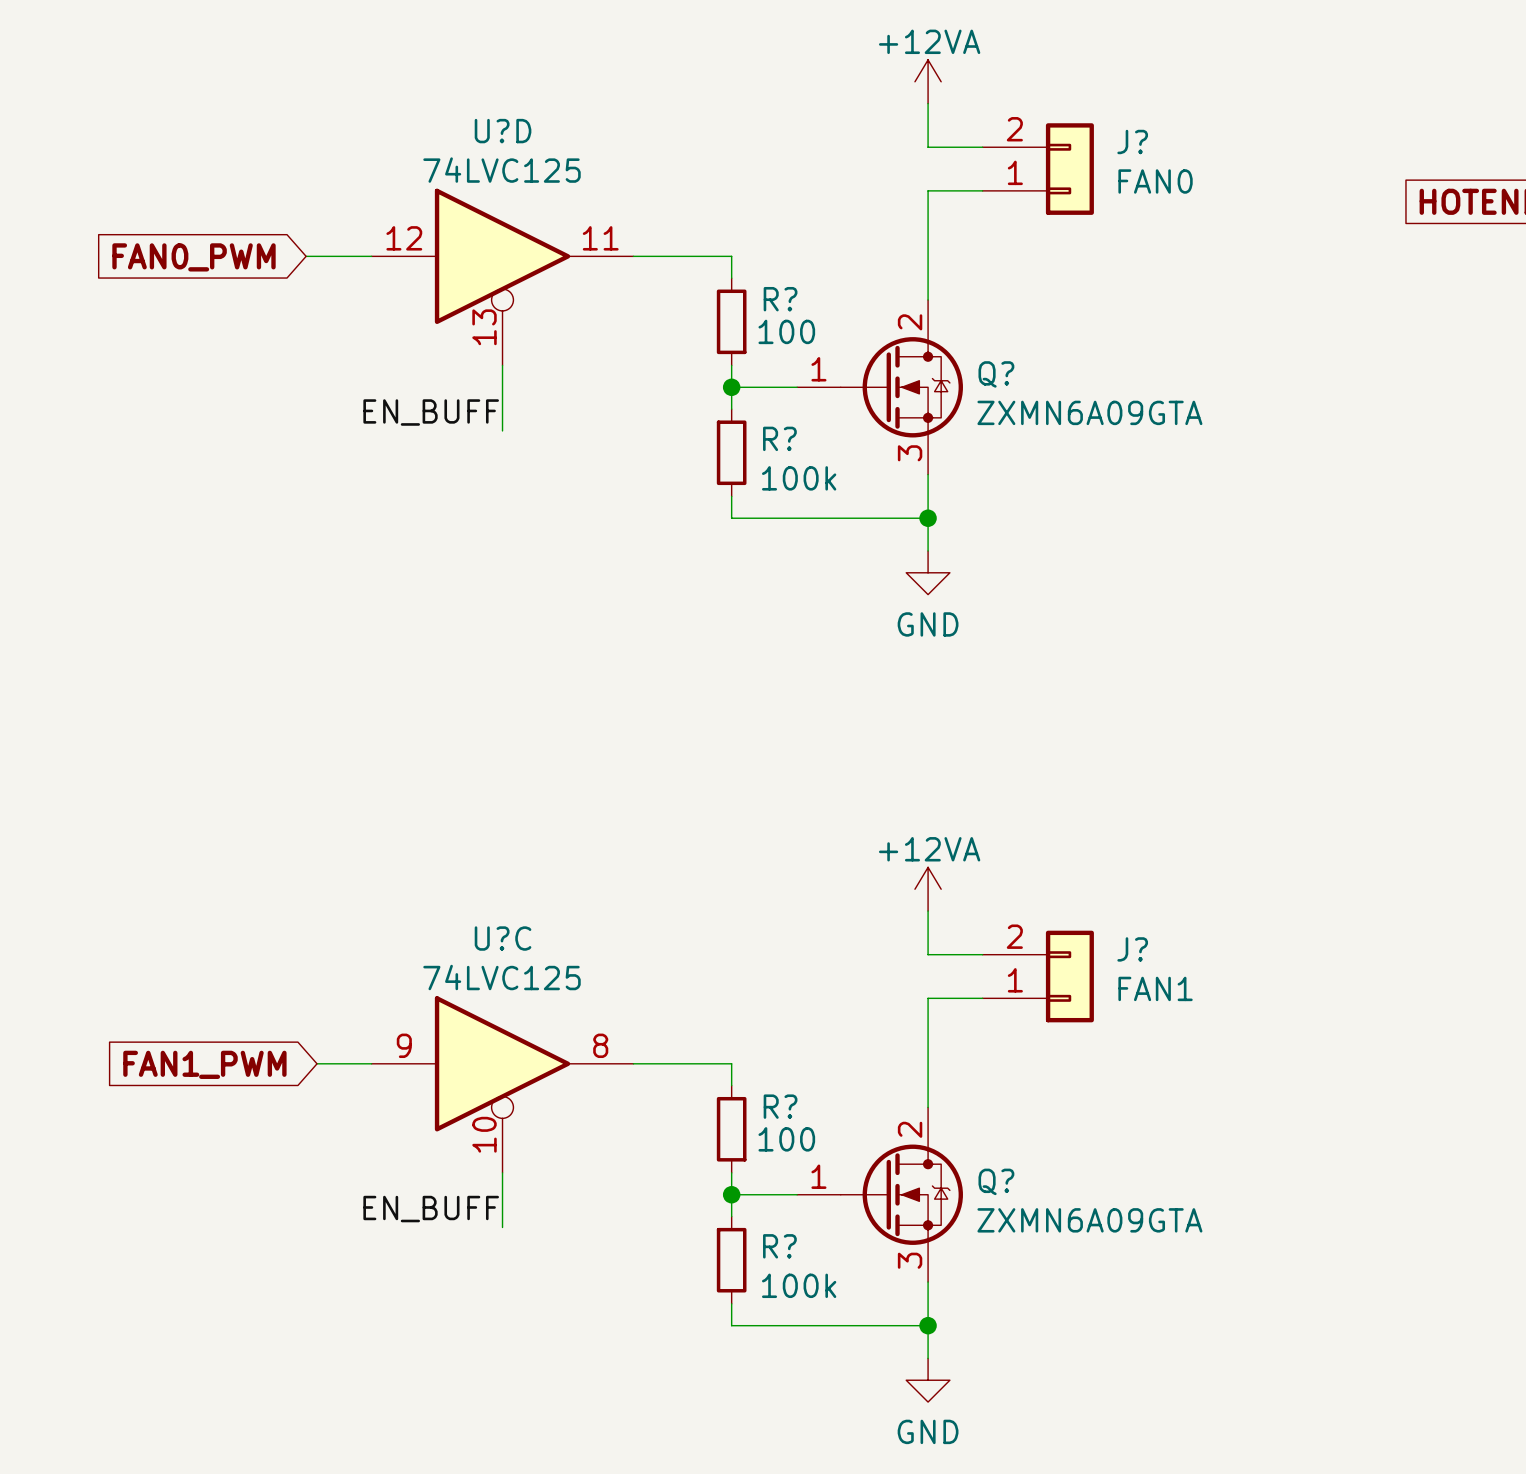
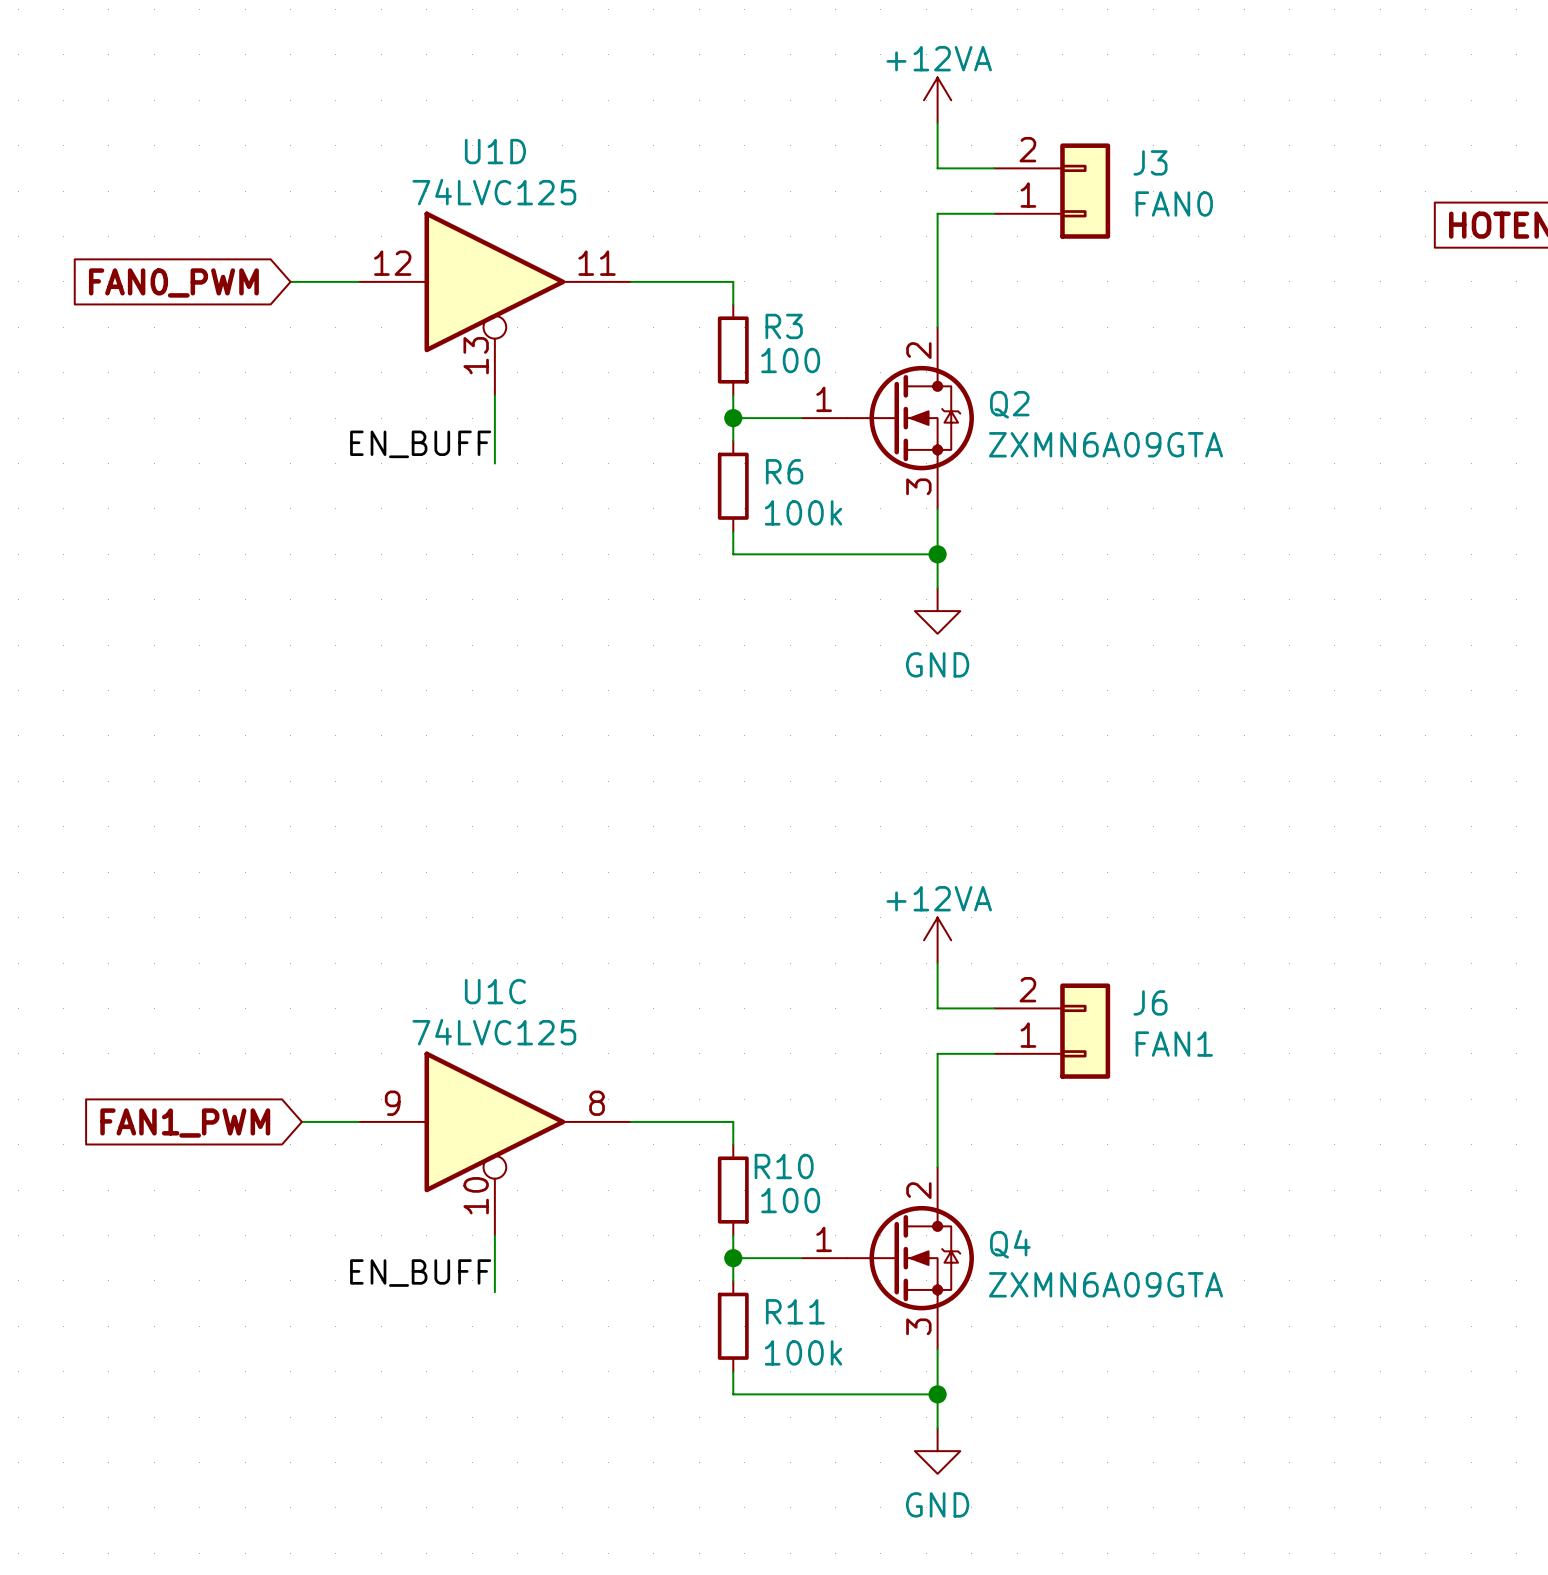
U?D name: U?D (503, 131) -> U1D (495, 151)
J? name: J? (1132, 141) -> J3 (1150, 162)
R? name: R? (780, 299) -> R3 (784, 326)
Q? name: Q? (996, 374) -> Q2 (1009, 404)
R? name: R? (779, 438) -> R6 (784, 471)
U?C name: U?C (503, 938) -> U1C (495, 991)
J? name: J? (1132, 949) -> J6 (1150, 1002)
R? name: R? (780, 1106) -> R10 (784, 1166)
Q? name: Q? (996, 1181) -> Q4 (1010, 1244)
R? name: R? (779, 1246) -> R11 (795, 1311)

